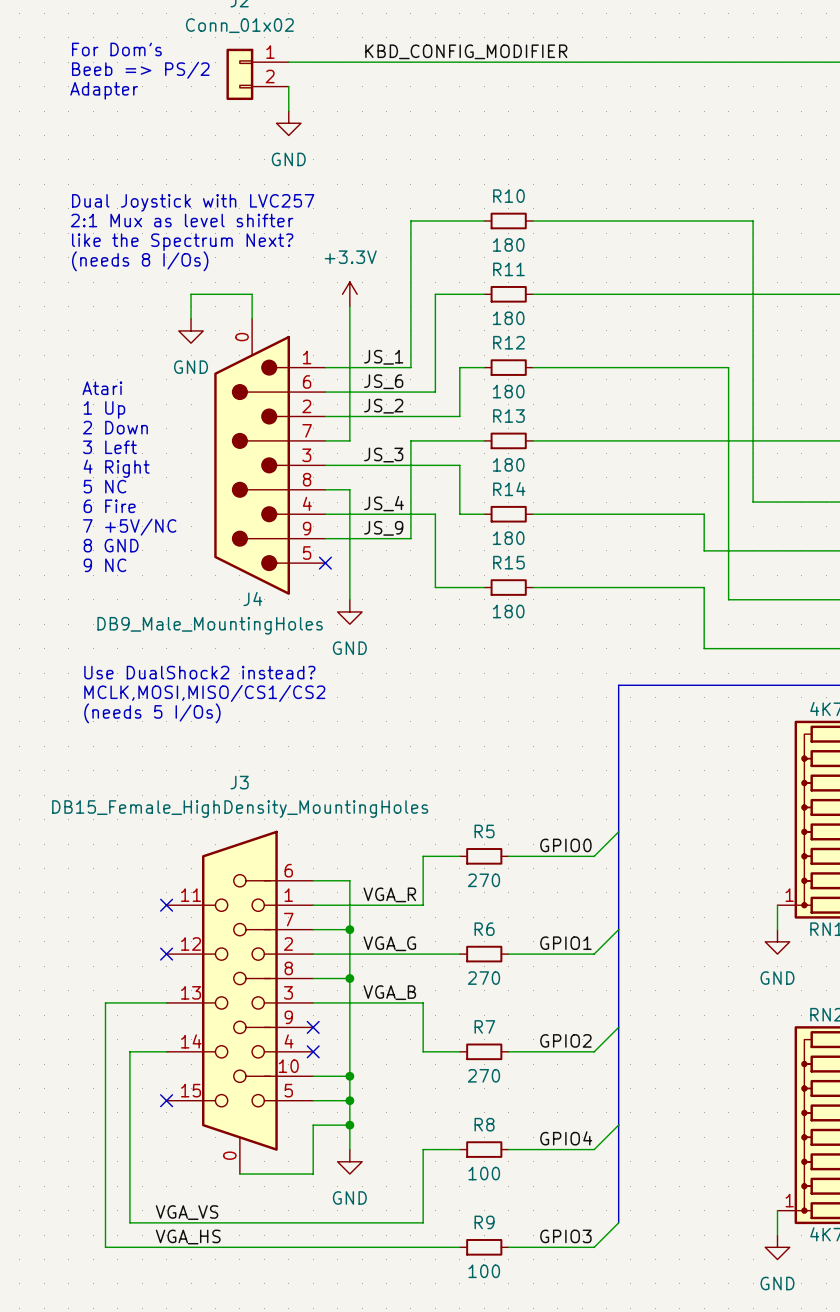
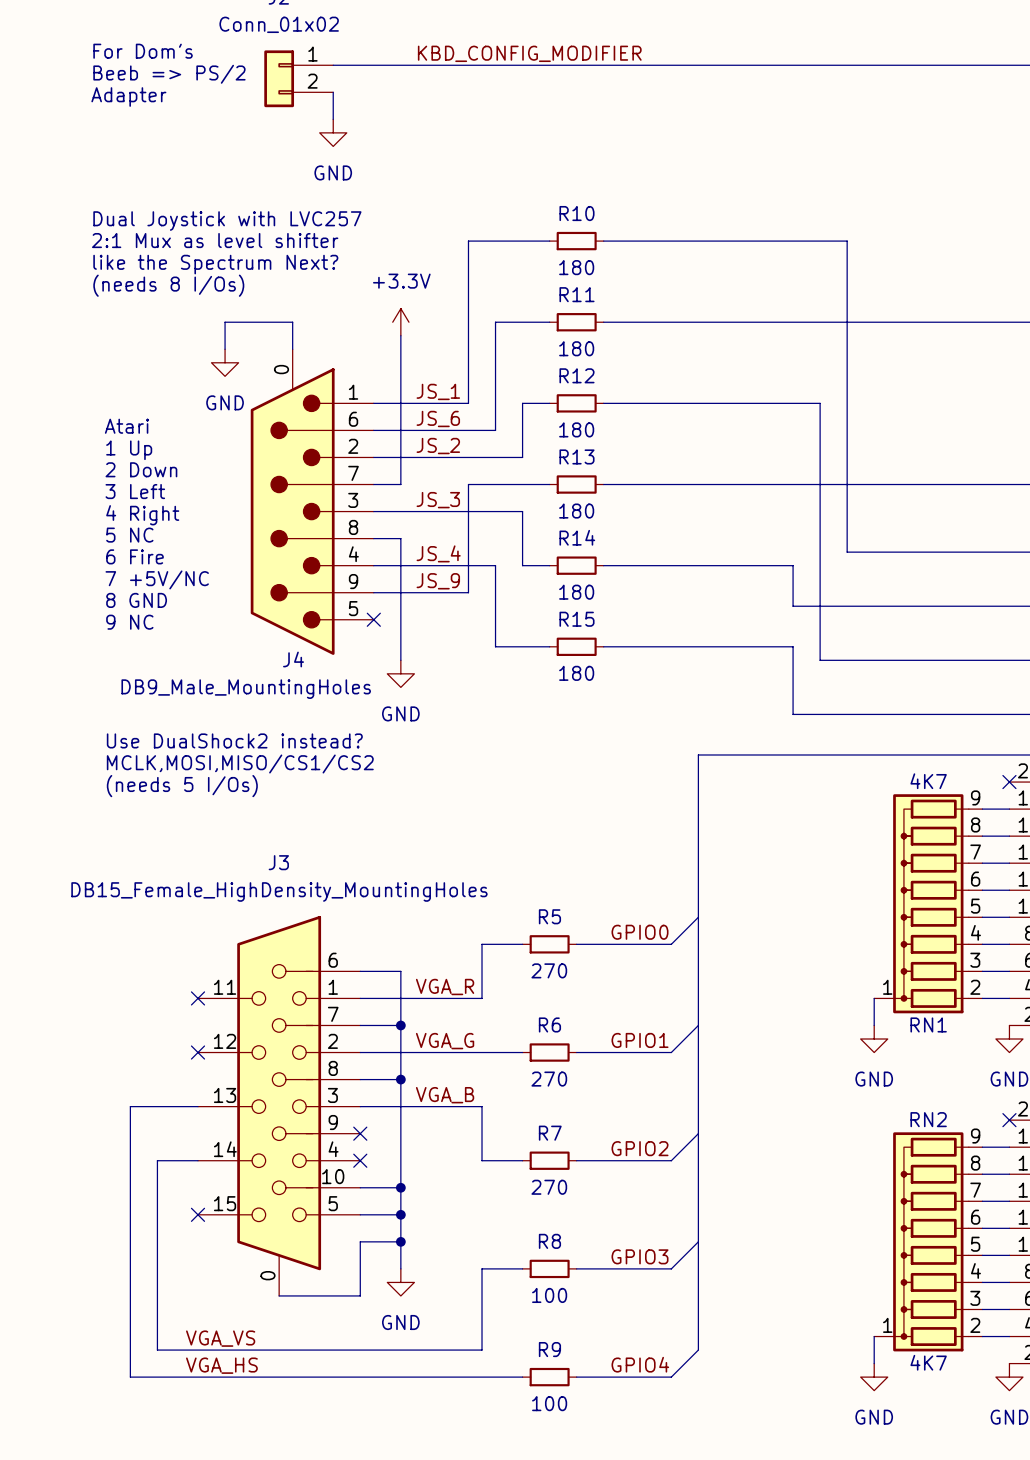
label: GPIO4 (566, 1138) -> GPIO3 (640, 1256)
label: GPIO3 (565, 1236) -> GPIO4 (640, 1364)

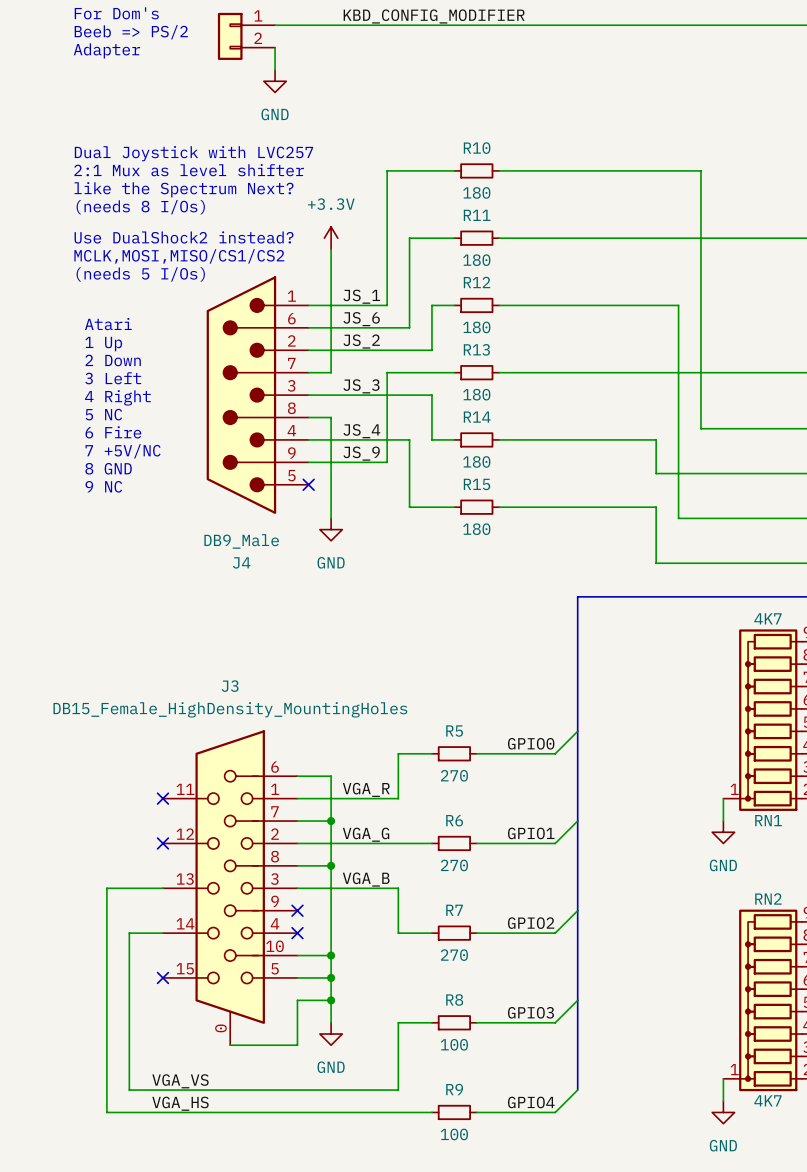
text: none -> Use DualShock2 instead? (184, 237)
text: none -> MCLK,MOSI,MISO/CS1/CS2 (179, 256)
wire: (225, 349) (225, 322) (292, 322) (292, 349) -> none
J4 symbol: [250, 349, 374, 655] -> [206, 276, 309, 514]
power symbol: GND (225, 362) -> none
text: none -> (needs 5 I/Os) (140, 274)
J4 name position: J4 (293, 659) -> J4 (241, 562)
J4 value: DB9_Male_MountingHoles (246, 689) -> DB9_Male (241, 541)
text: Use DualShock2 instead? (234, 740) -> none
text: MCLK,MOSI,MISO/CS1/CS2 (240, 764) -> none
text: (needs 5 I/Os) (182, 786) -> none

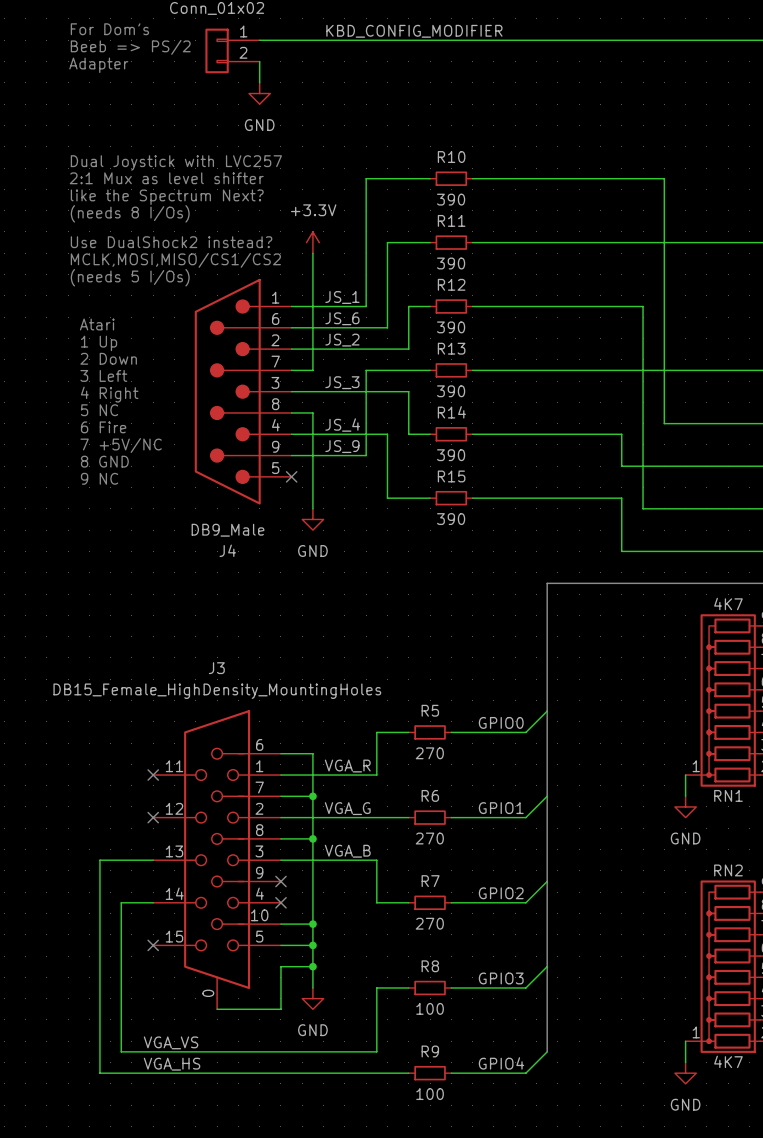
R10 value: 180 (476, 192) -> 390 (451, 199)
R11 value: 180 (476, 260) -> 390 (451, 263)
R12 value: 180 (476, 327) -> 390 (451, 327)
R13 value: 180 (476, 394) -> 390 (451, 391)
R14 value: 180 (476, 461) -> 390 (451, 455)
R15 value: 180 (476, 529) -> 390 (451, 519)

